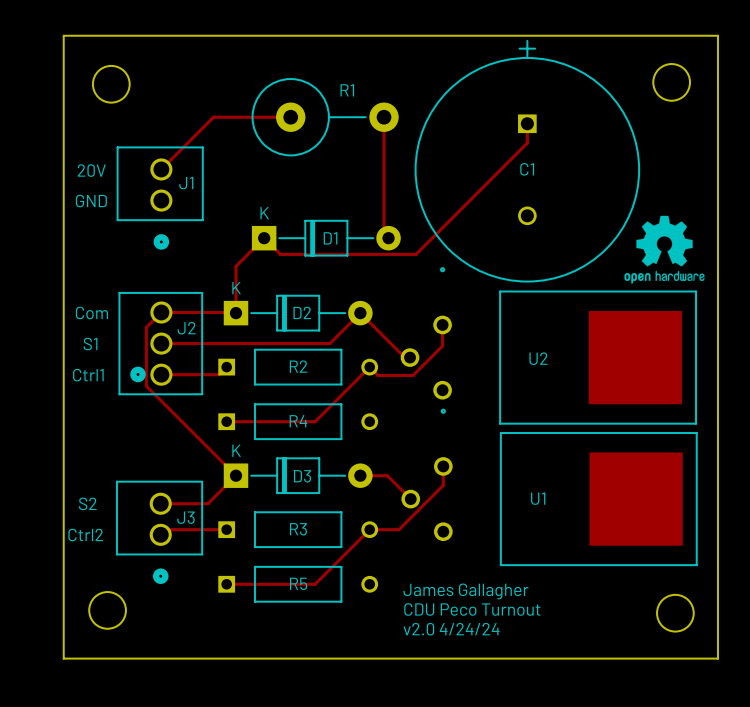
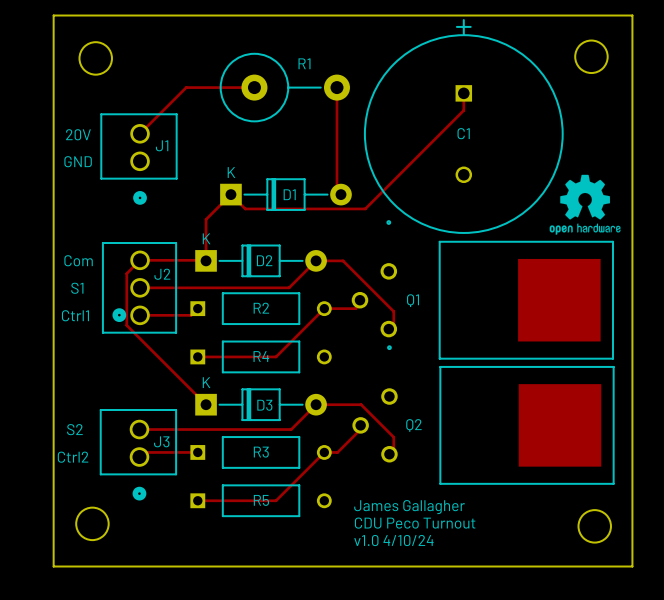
track: (360, 313) (404, 357) (410, 357) -> (316, 260) (343, 260) (393, 311) (393, 328)
track: (442, 324) (442, 345) (413, 375) (378, 375) (369, 367) -> (364, 299) (355, 308) (324, 308)
U2 name: U2 (538, 358) -> Q1 (413, 300)
track: (443, 466) (443, 485) (398, 529) (384, 529) -> (364, 425) (337, 452)
track: (236, 475) (207, 503) -> (316, 404) (291, 429) (181, 429)
track: (387, 475) (410, 499) -> (339, 404) (361, 404) (393, 437) (393, 453)
U1 name: U1 (538, 498) -> Q2 (413, 425)
text: v2.0 4/24/24 (451, 629) -> v1.0 4/10/24 (393, 540)

